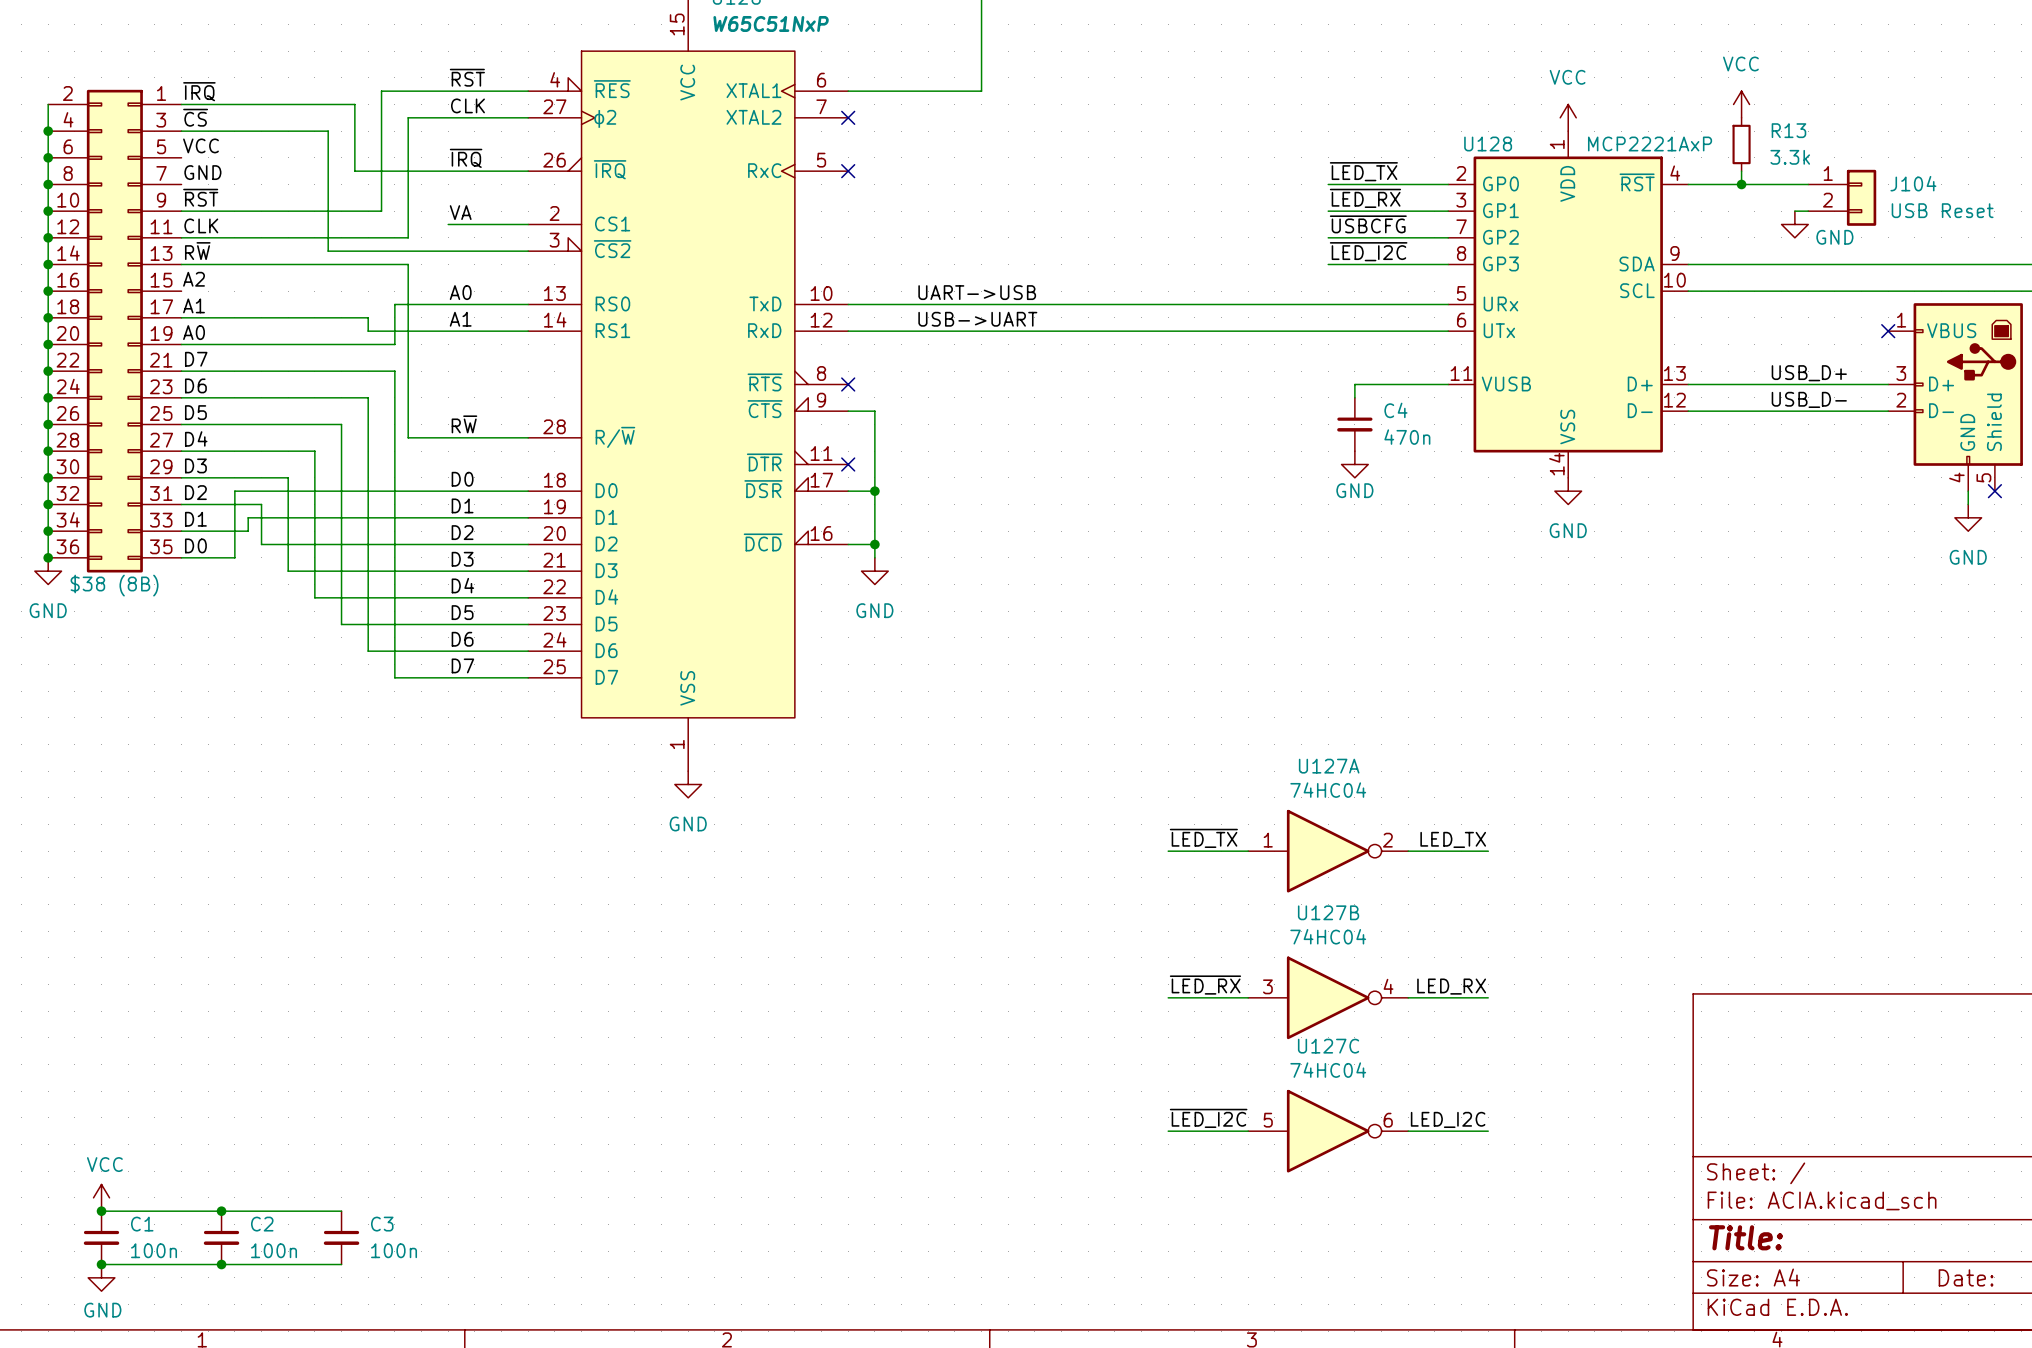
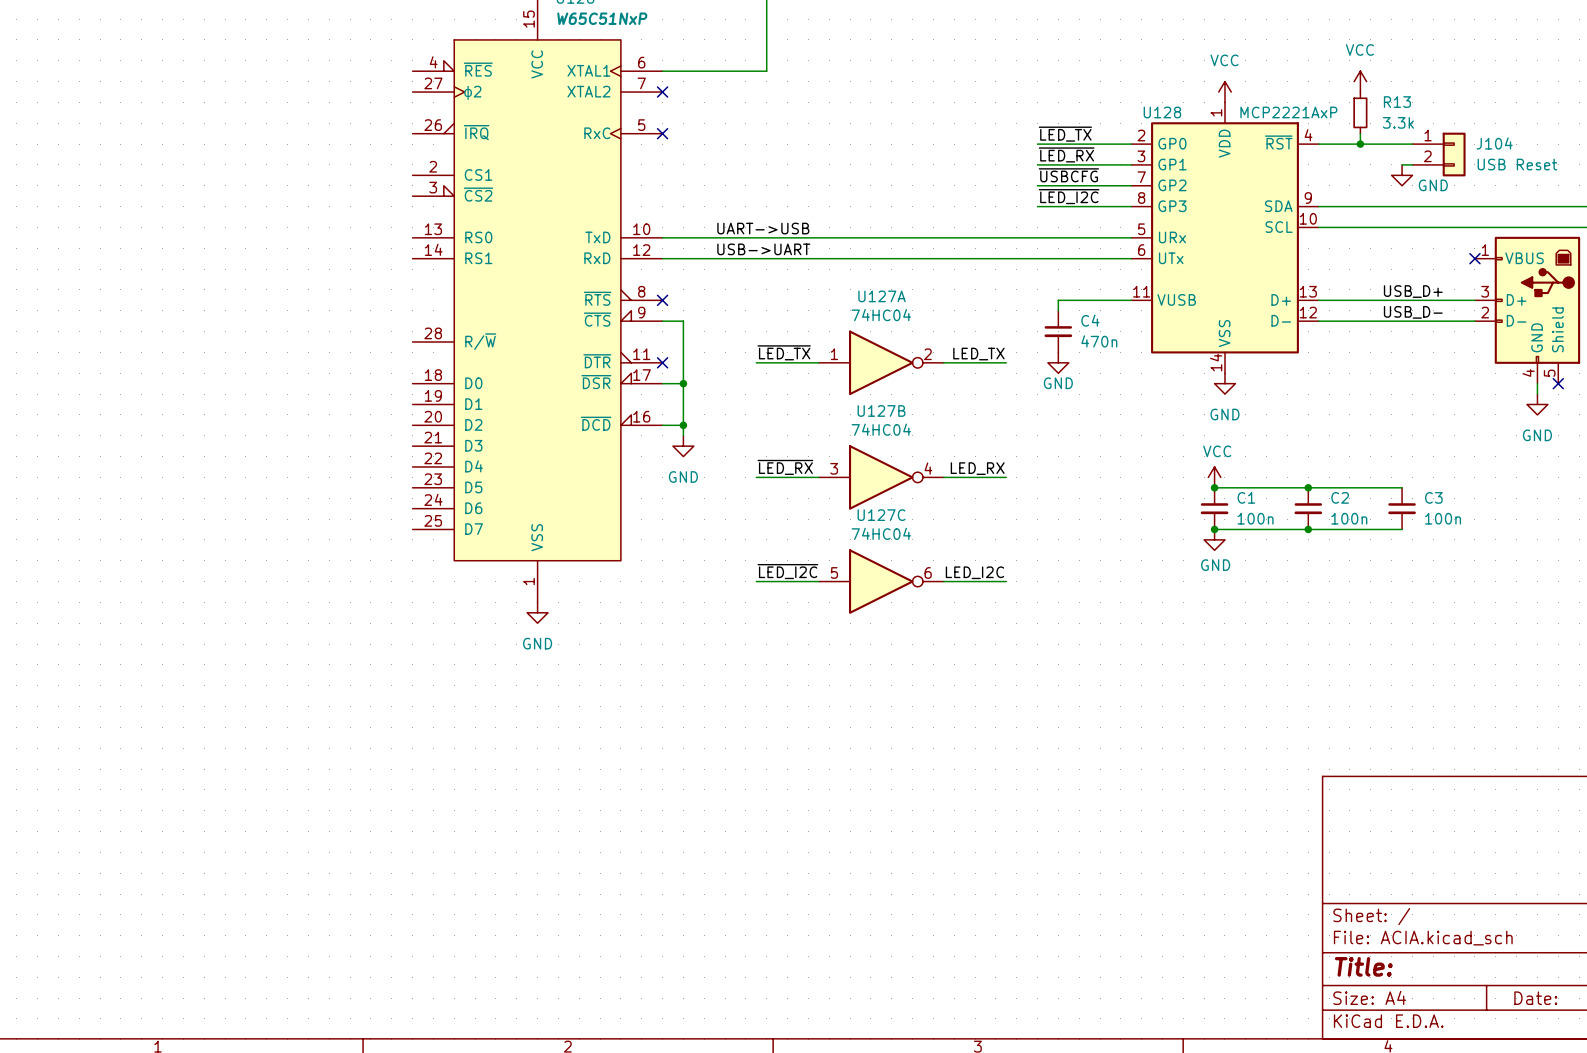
label: ~{RST} (467, 77) -> none
label: ~{IRQ} (199, 91) -> none
wire: (528, 91) (381, 91) (381, 211) (181, 211) -> none
wire: (48, 104) (48, 557) -> none
wire: (181, 104) (354, 104) (354, 171) (528, 171) -> none
label: CLK (467, 105) -> none
label: ~{CS} (195, 117) -> none
wire: (528, 117) (408, 117) (408, 237) (181, 237) -> none
junction: (48, 131) -> none
wire: (181, 131) (328, 131) (328, 251) (528, 251) -> none
label: VCC (200, 145) -> none
junction: (48, 157) -> none
label: ~{IRQ} (466, 158) -> none
label: GND (202, 172) -> none
junction: (48, 184) -> none
label: ~{RST} (200, 197) -> none
junction: (48, 211) -> none
label: VA (460, 212) -> none
wire: (448, 224) (528, 224) -> none
label: CLK (201, 225) -> none
junction: (48, 237) -> none
label: R~{W} (197, 251) -> none
junction: (48, 264) -> none
wire: (181, 264) (408, 264) (408, 437) (528, 437) -> none
label: A2 (194, 279) -> none
junction: (48, 291) -> none
label: A0 (460, 292) -> none
wire: (528, 304) (394, 304) (394, 344) (181, 344) -> none
label: A1 (194, 305) -> none
junction: (48, 317) -> none
wire: (181, 317) (368, 317) (368, 331) (528, 331) -> none
label: A1 (460, 319) -> none
part: $38 (8B) (114, 331) -> none
label: A0 (194, 332) -> none
junction: (48, 344) -> none
label: D7 (196, 359) -> none
junction: (48, 371) -> none
wire: (181, 371) (394, 371) (394, 677) (528, 677) -> none
label: D6 (195, 385) -> none
junction: (48, 397) -> none
wire: (181, 397) (368, 397) (368, 651) (528, 651) -> none
label: D5 (195, 412) -> none
junction: (48, 424) -> none
wire: (181, 424) (341, 424) (341, 624) (528, 624) -> none
label: R~{W} (464, 424) -> none
label: D4 (196, 438) -> none
junction: (48, 451) -> none
wire: (181, 451) (314, 451) (314, 597) (528, 597) -> none
label: none -> ~{LED_TX} (784, 352)
label: none -> LED_TX (978, 354)
wire: none -> (756, 362) (818, 362)
wire: none -> (943, 362) (1006, 362)
label: D3 (195, 465) -> none
junction: (48, 477) -> none
wire: (181, 477) (288, 477) (288, 571) (528, 571) -> none
label: D0 (462, 479) -> none
wire: (528, 491) (234, 491) (234, 557) (181, 557) -> none
label: D2 (195, 492) -> none
junction: (48, 504) -> none
wire: (181, 504) (261, 504) (261, 544) (528, 544) -> none
label: D1 (462, 505) -> none
wire: (528, 517) (248, 517) (248, 531) (181, 531) -> none
label: D1 (195, 519) -> none
junction: (48, 531) -> none
label: D2 (462, 532) -> none
label: D0 (195, 545) -> none
junction: (48, 557) -> none
label: D3 (462, 559) -> none
power symbol: GND (48, 571) -> none
label: D4 (462, 585) -> none
label: none -> ~{LED_RX} (785, 467)
label: none -> LED_RX (977, 468)
wire: none -> (756, 477) (818, 477)
wire: none -> (943, 477) (1006, 477)
power symbol: none -> VCC (1214, 477)
label: D5 (462, 612) -> none
wire: none -> (1214, 487) (1402, 487)
junction: none -> (1214, 487)
junction: none -> (1308, 487)
label: D6 (462, 639) -> none
label: D7 (462, 665) -> none
wire: none -> (1214, 529) (1402, 529)
junction: none -> (1214, 529)
junction: none -> (1308, 529)
power symbol: none -> GND (1214, 539)
label: none -> ~{LED_I2C} (787, 571)
label: none -> LED_I2C (974, 572)
label: ~{LED_TX} (1203, 838) -> none
label: LED_TX (1453, 839) -> none
wire: (1168, 851) (1248, 851) -> (756, 581) (818, 581)
U127A position: (1328, 851) -> (881, 362)
wire: (1408, 851) (1488, 851) -> (943, 581) (1006, 581)
label: ~{LED_RX} (1205, 985) -> none
label: LED_RX (1451, 986) -> none
wire: (1168, 997) (1248, 997) -> none
U127B position: (1328, 997) -> (881, 477)
wire: (1408, 997) (1488, 997) -> none
label: ~{LED_I2C} (1208, 1118) -> none
label: LED_I2C (1448, 1119) -> none
wire: (1168, 1131) (1248, 1131) -> none
U127C position: (1328, 1131) -> (881, 581)
wire: (1408, 1131) (1488, 1131) -> none
power symbol: VCC (101, 1197) -> none
wire: (101, 1211) (341, 1211) -> none
junction: (101, 1211) -> none
junction: (221, 1211) -> none
C1 position: (101, 1237) -> (1214, 508)
C2 position: (221, 1237) -> (1308, 508)
C3 position: (341, 1237) -> (1402, 508)
wire: (101, 1264) (341, 1264) -> none
junction: (101, 1264) -> none
junction: (221, 1264) -> none
power symbol: GND (101, 1277) -> none

